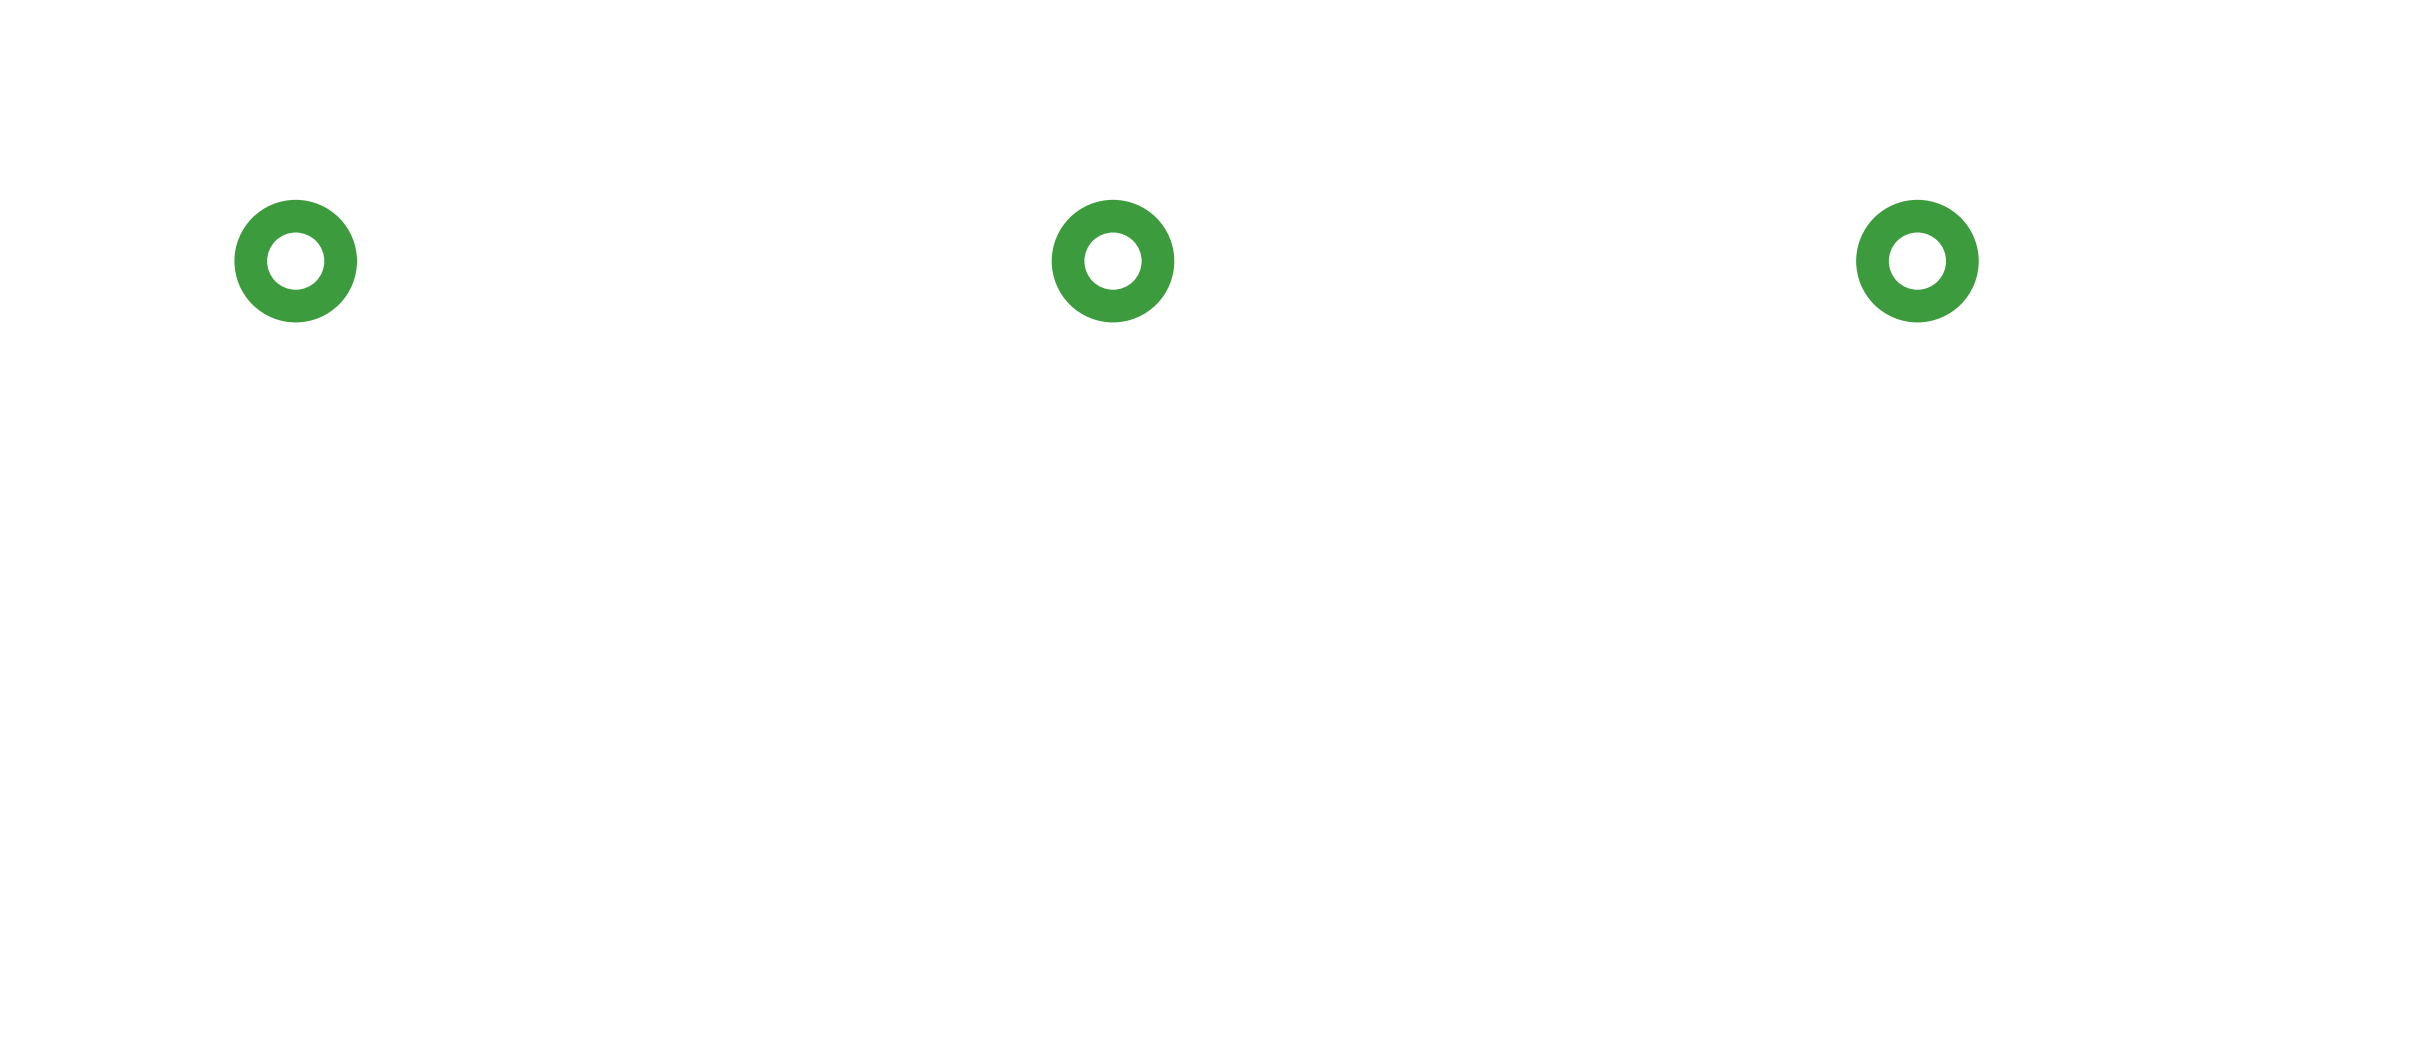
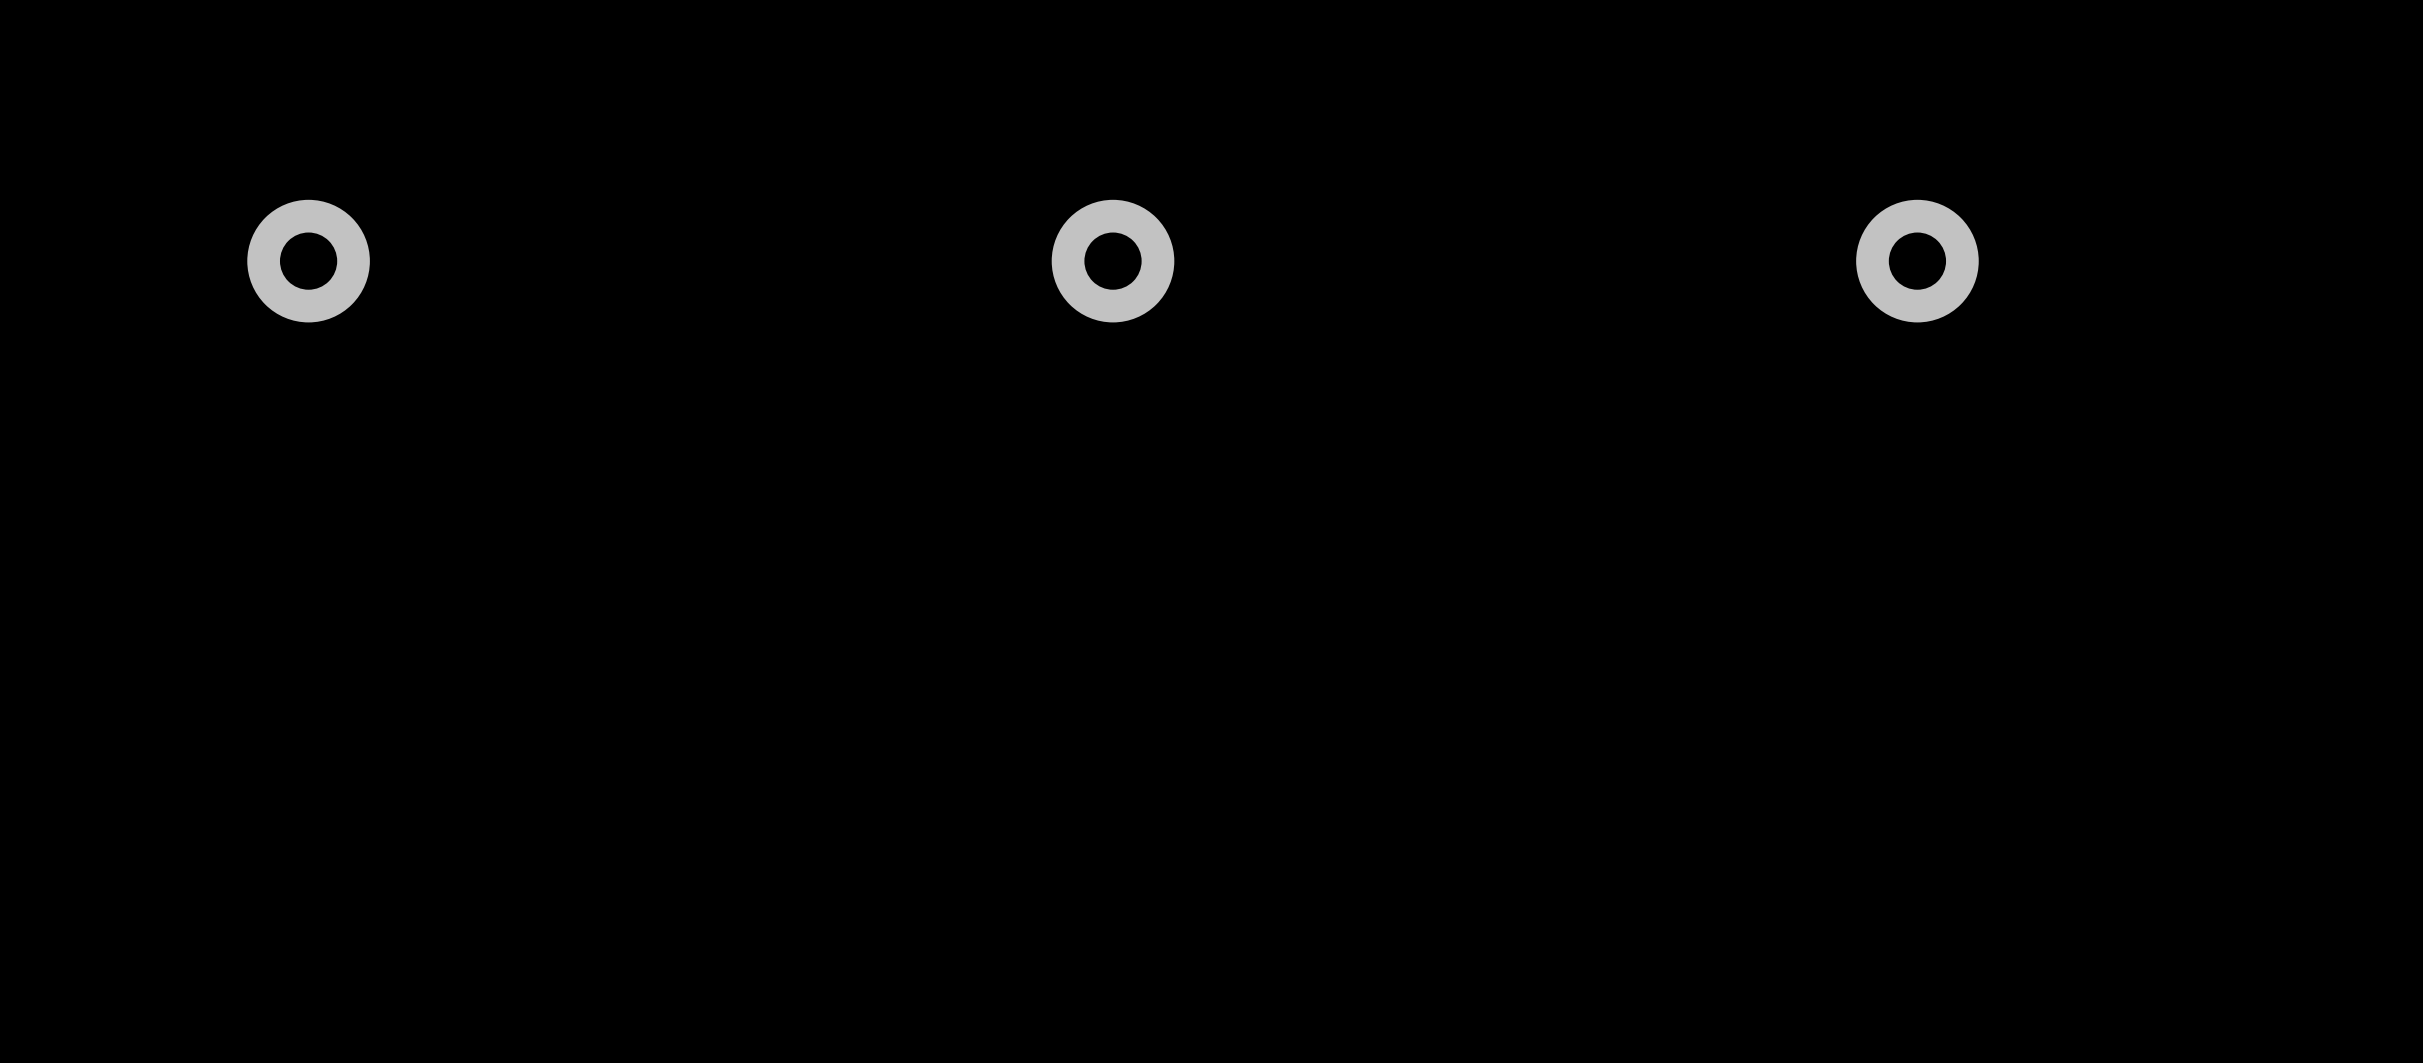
via position: (295, 261) -> (308, 261)

